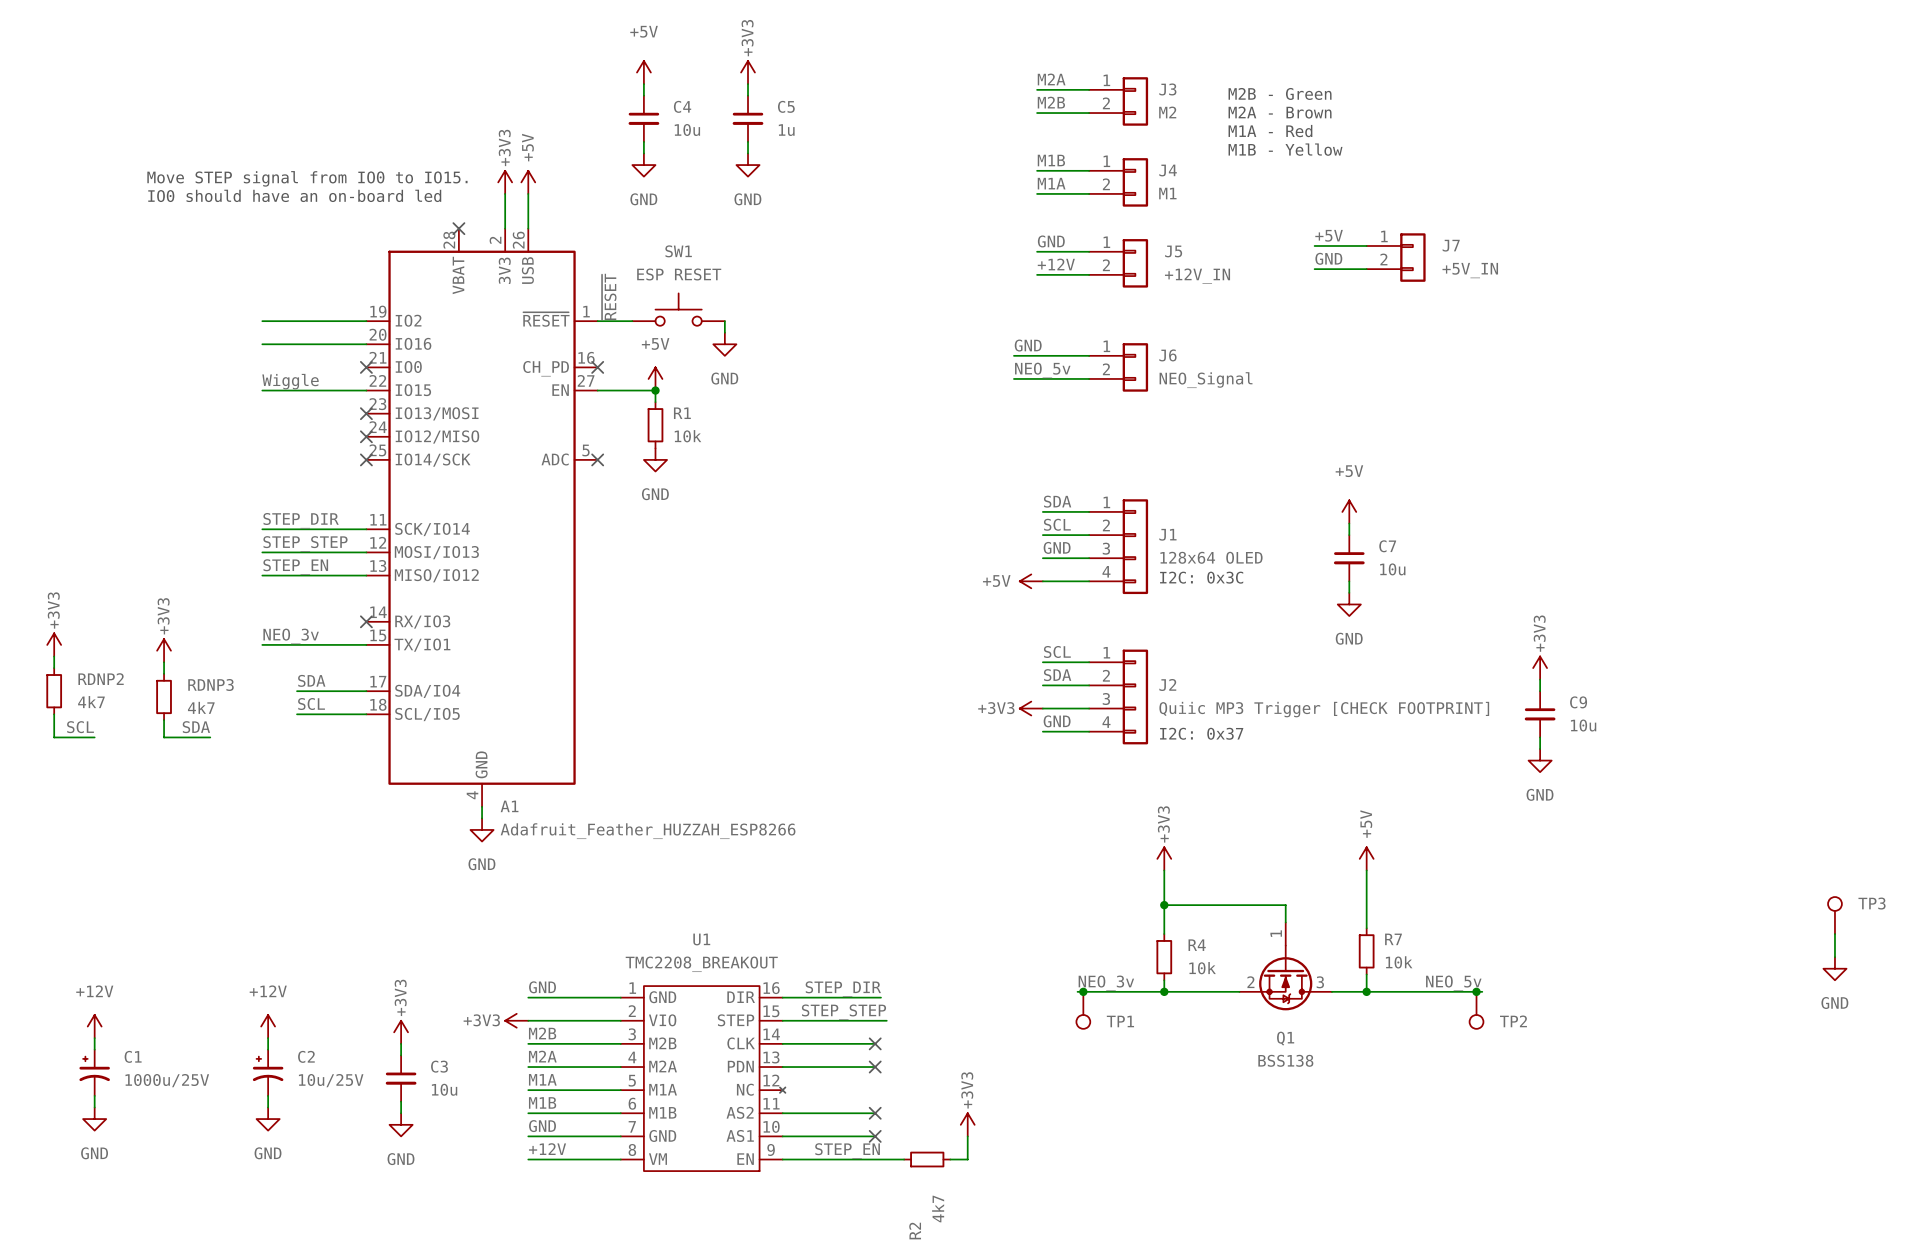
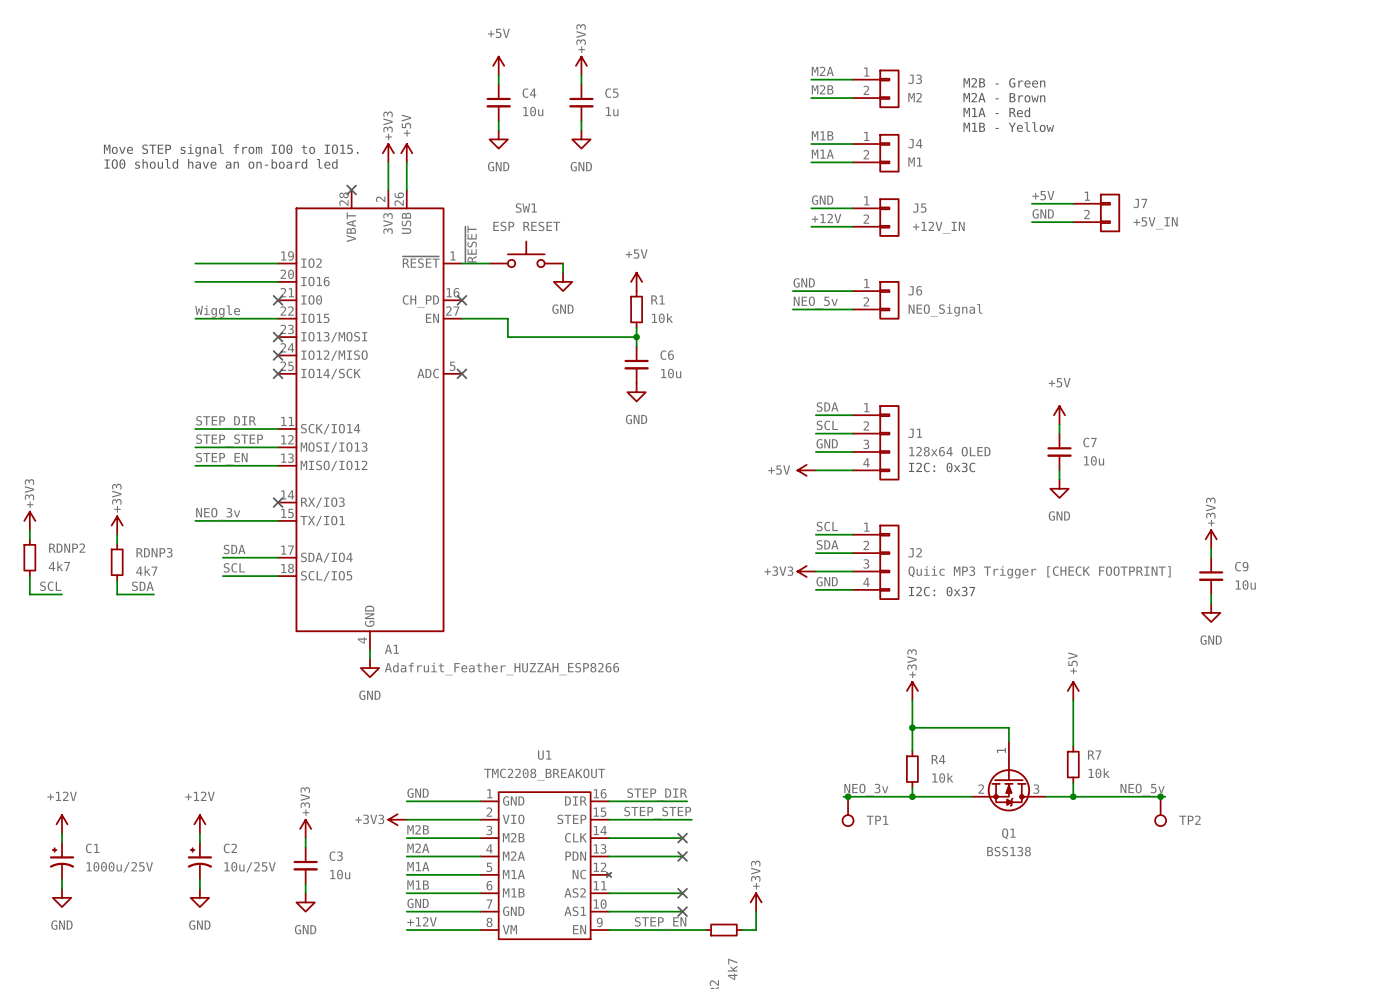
power symbol position: +5V (655, 378) -> +5V (636, 281)
junction: (655, 390) -> none
wire: none -> (507, 327) (507, 337) (636, 337)
wire: none -> (636, 327) (636, 346)
junction: none -> (636, 337)
R1 position: (655, 425) -> (636, 309)
C6: none -> 10u (636, 364)
power symbol position: GND (655, 459) -> GND (636, 392)

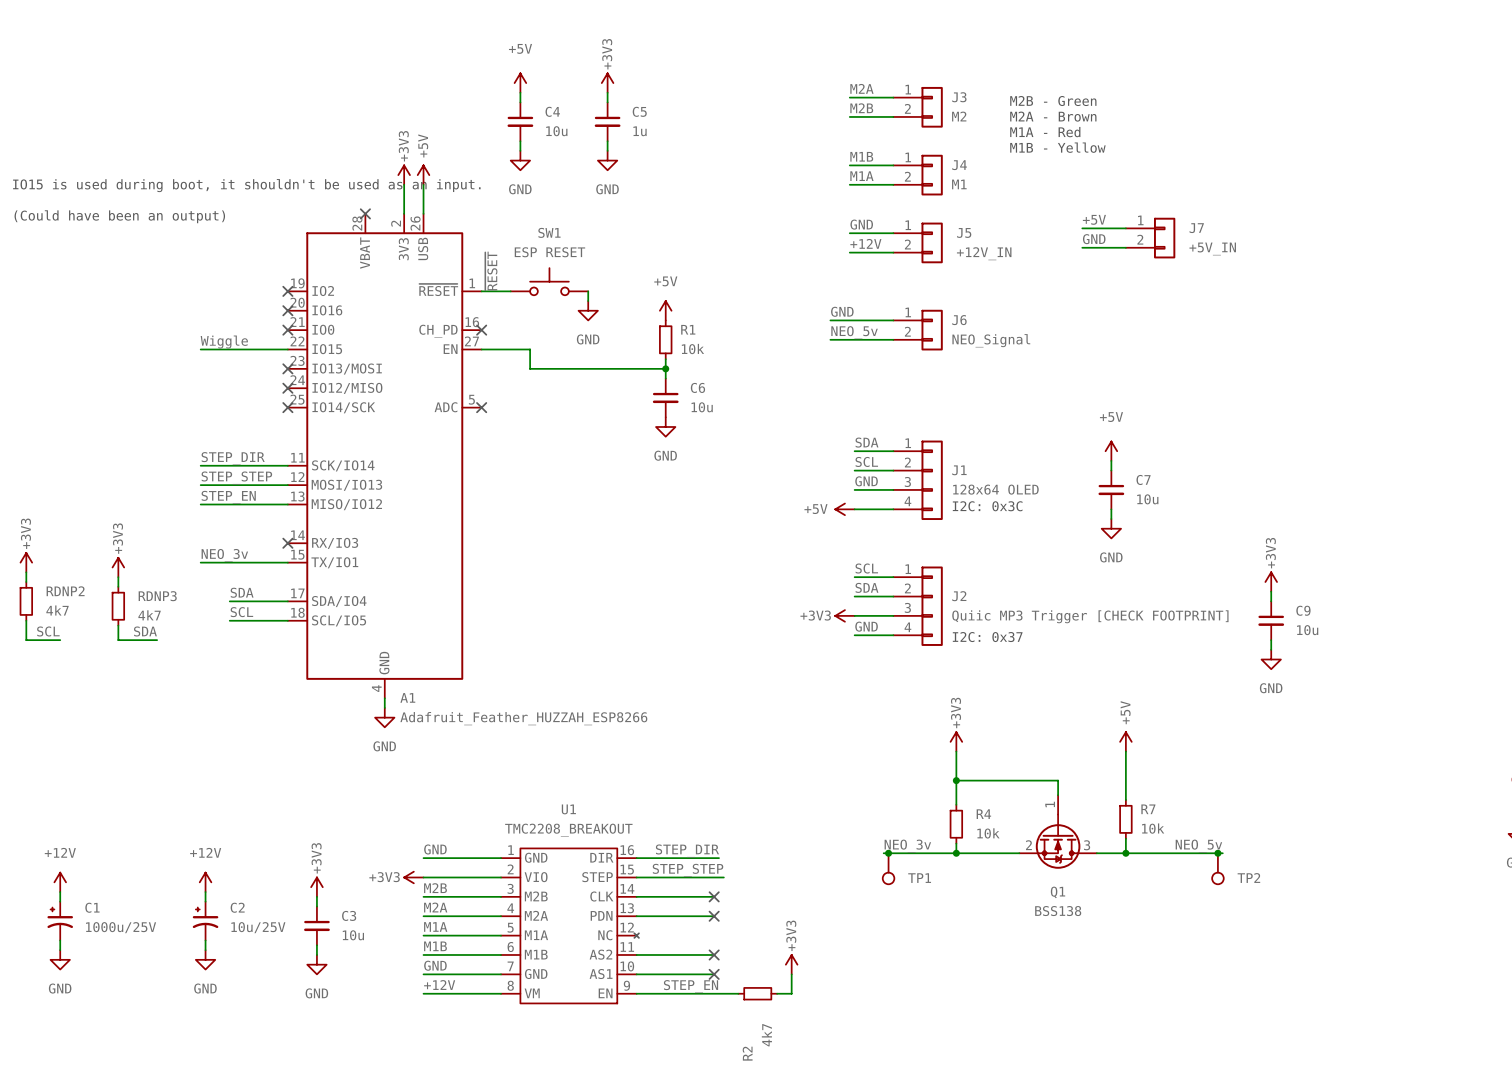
text: Move STEP signal from IO0 to IO15. (231, 150) -> none
text: IO0 should have an on-board led (221, 163) -> none
text: none -> IO15 is used during boot, it shouldn't be used as an input. (246, 185)
text: none -> (Could have been an output) (119, 216)
wire: (195, 263) (278, 263) -> none
no-connect mark: none -> (287, 291)
wire: (195, 281) (278, 281) -> none
no-connect mark: none -> (287, 310)

